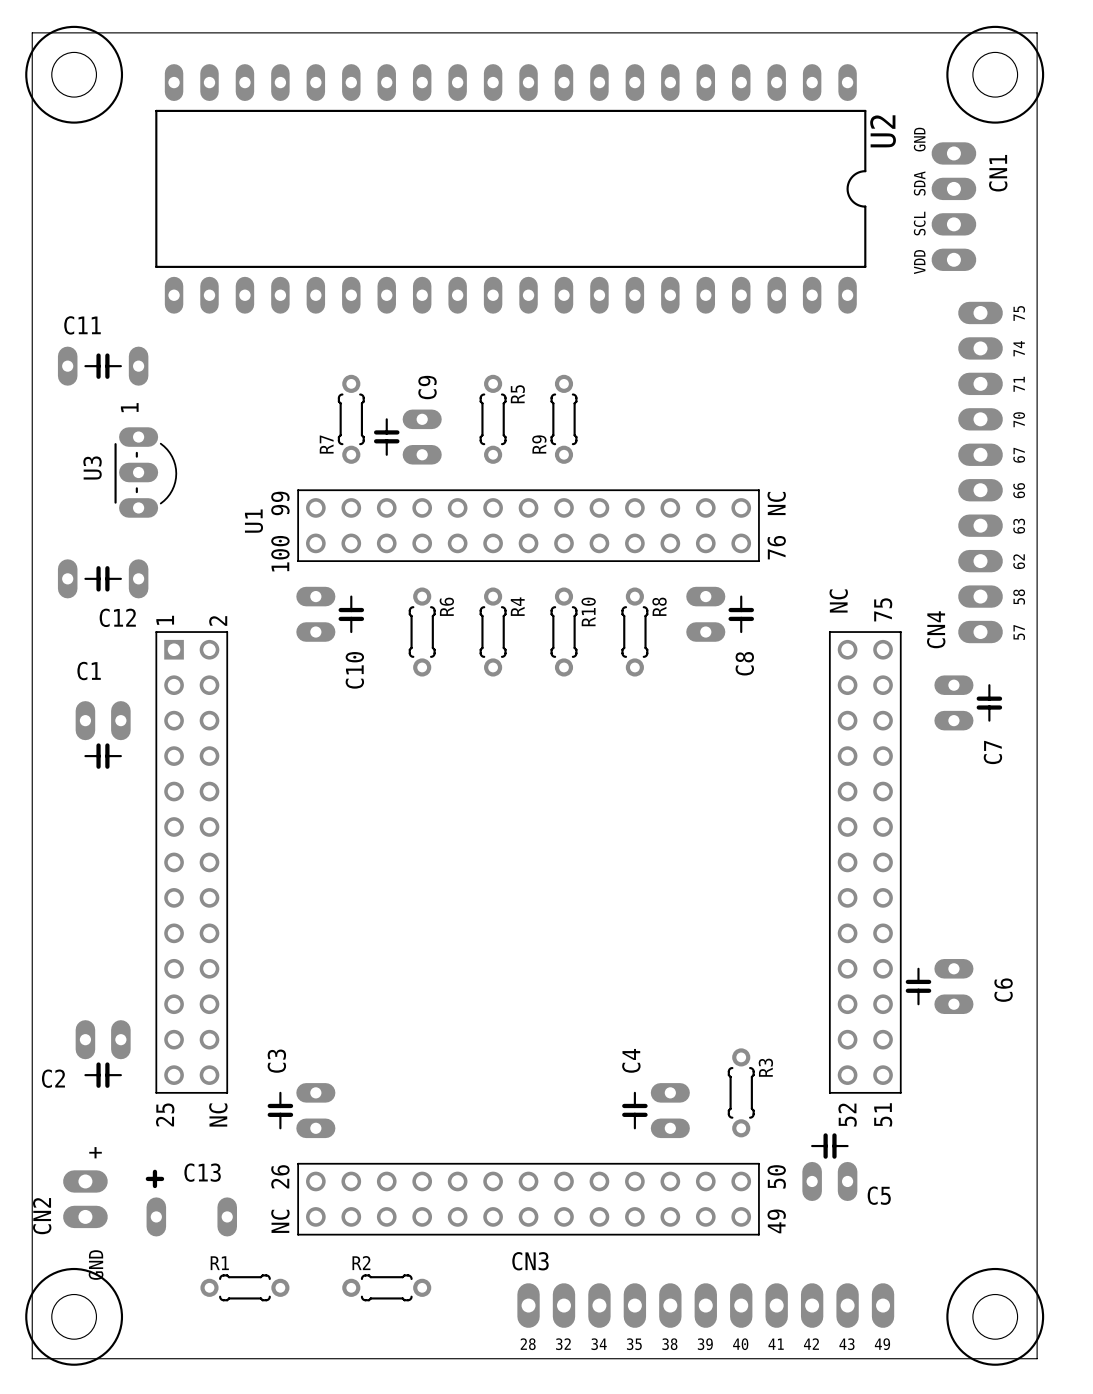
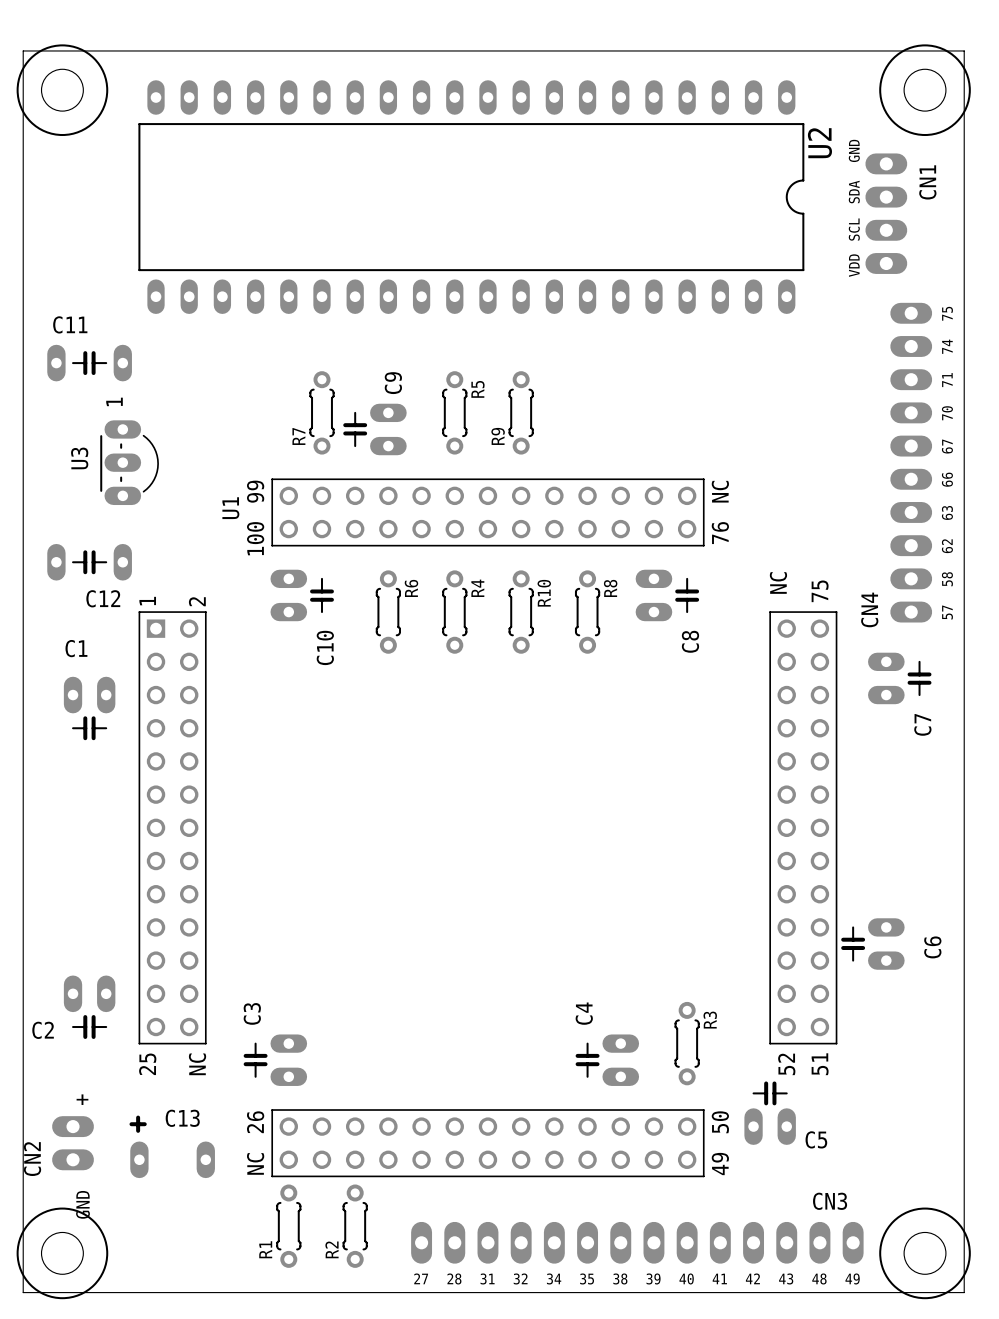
CN3 name position: CN3 (530, 1261) -> CN3 (830, 1201)
R1 name position: R1 (219, 1263) -> R1 (265, 1249)
R2 name position: R2 (361, 1263) -> R2 (332, 1249)
CN3 footprint: [517, 1283, 895, 1328] -> [411, 1221, 864, 1264]
R1 rotation: 0° (244, 1287) -> 90° clockwise (288, 1226)
R1 position: (244, 1287) -> (288, 1226)
R2 rotation: 0° (386, 1287) -> 90° clockwise (355, 1226)

